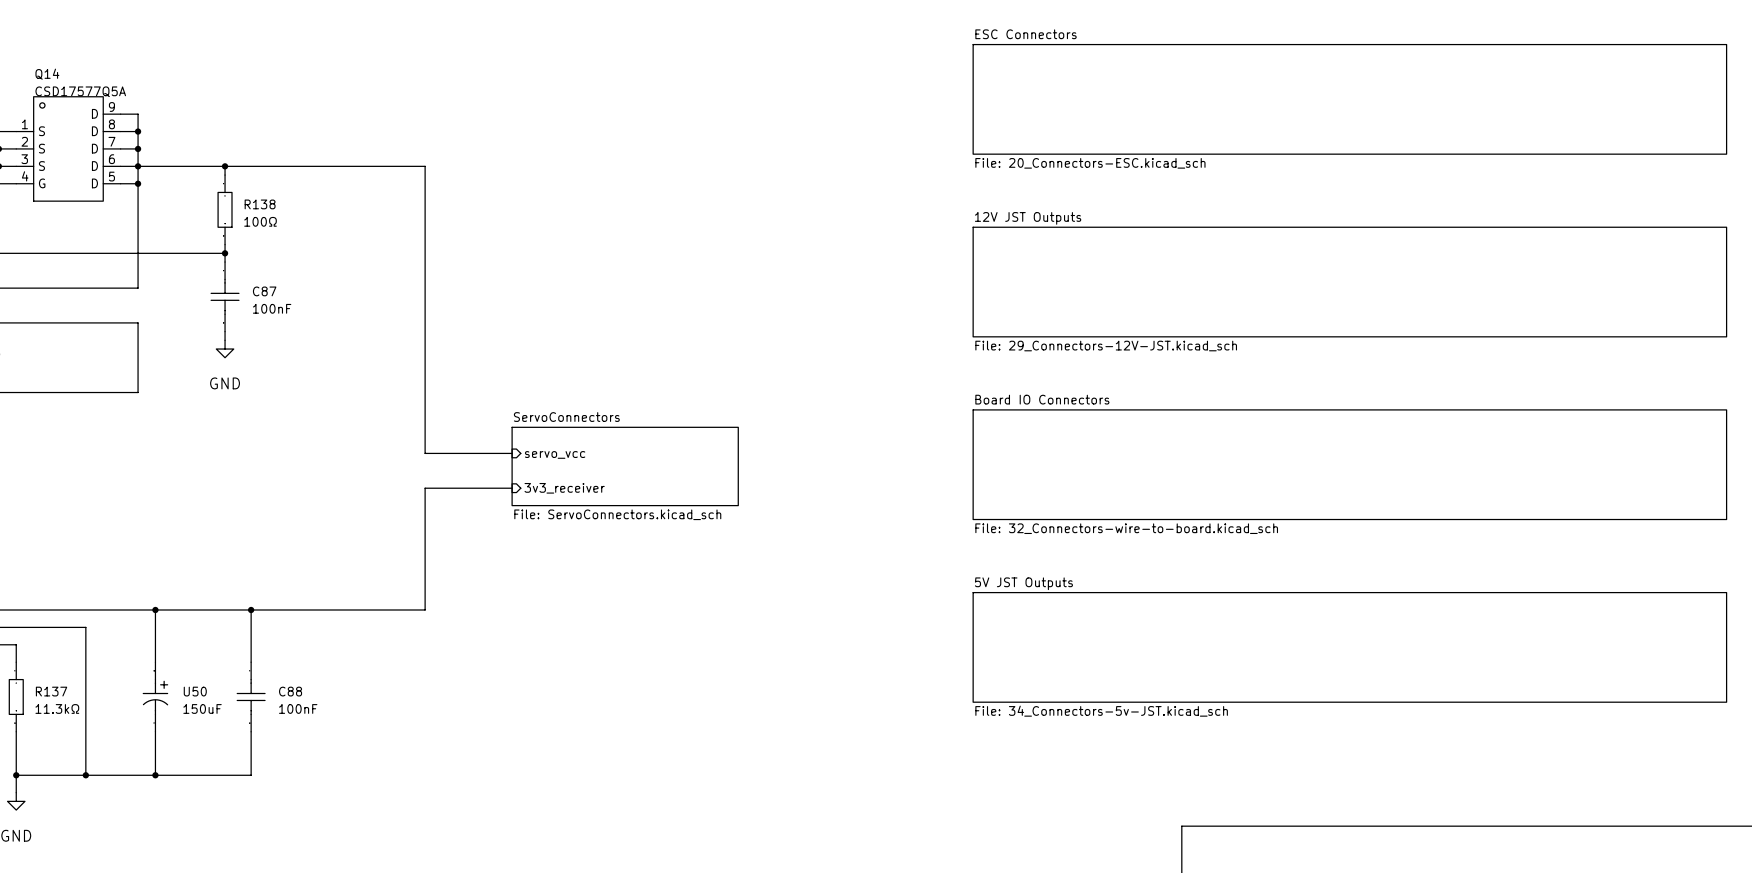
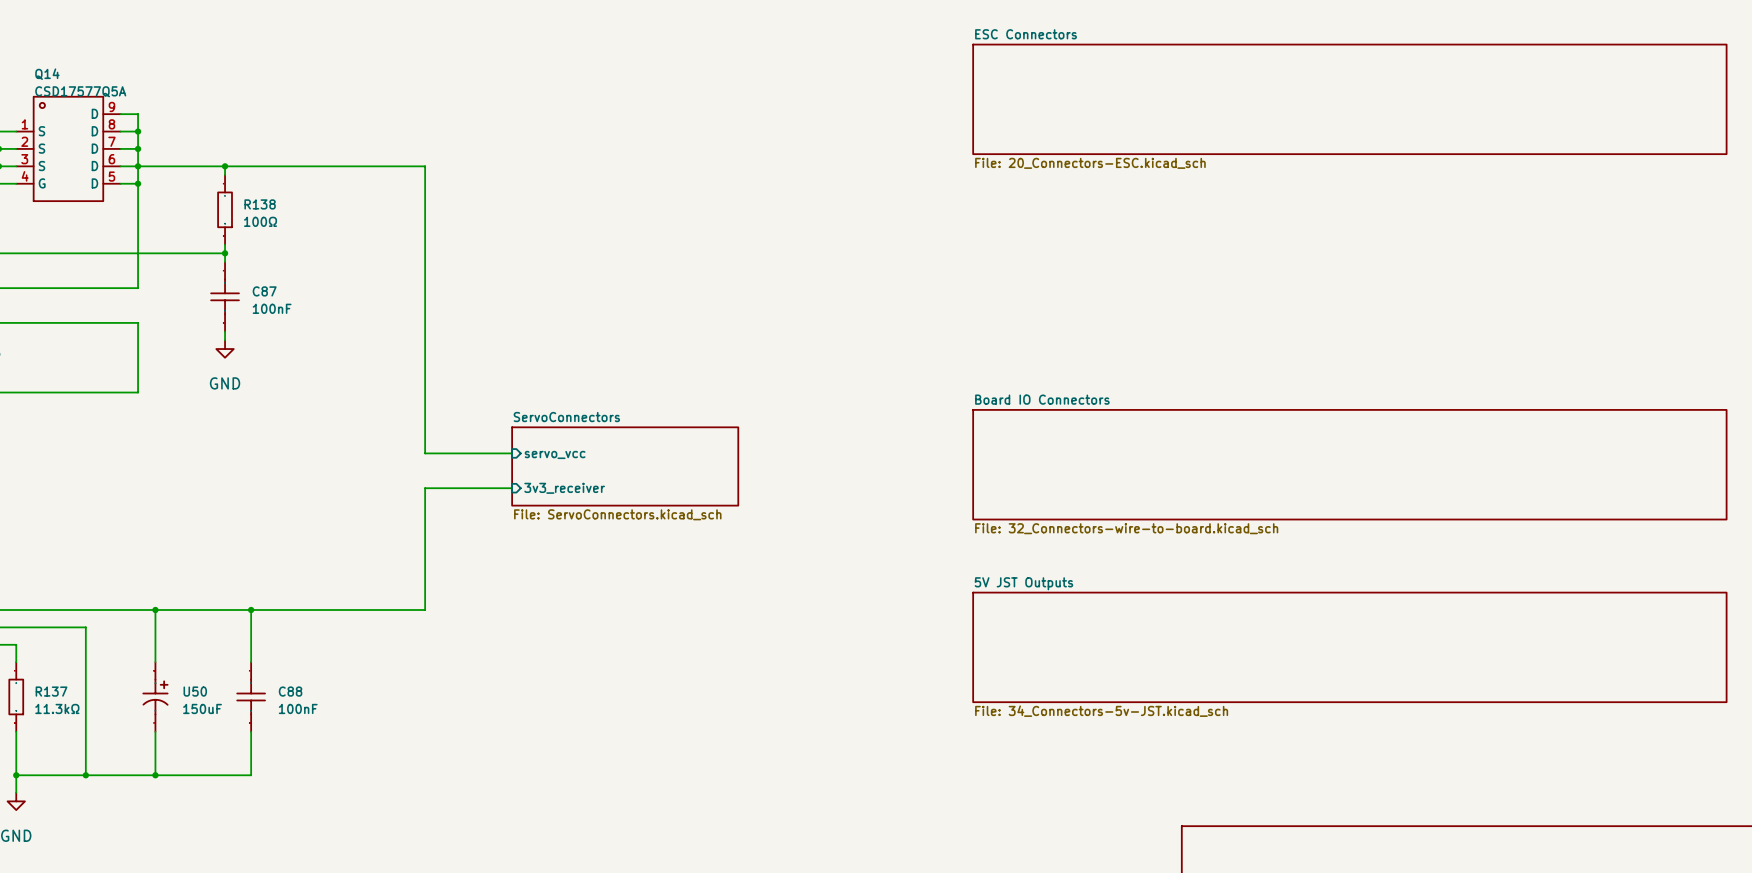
sheet 12V JST Outputs: File: 29_Connectors-12V-JST.kicad_sch (1349, 282) -> none

